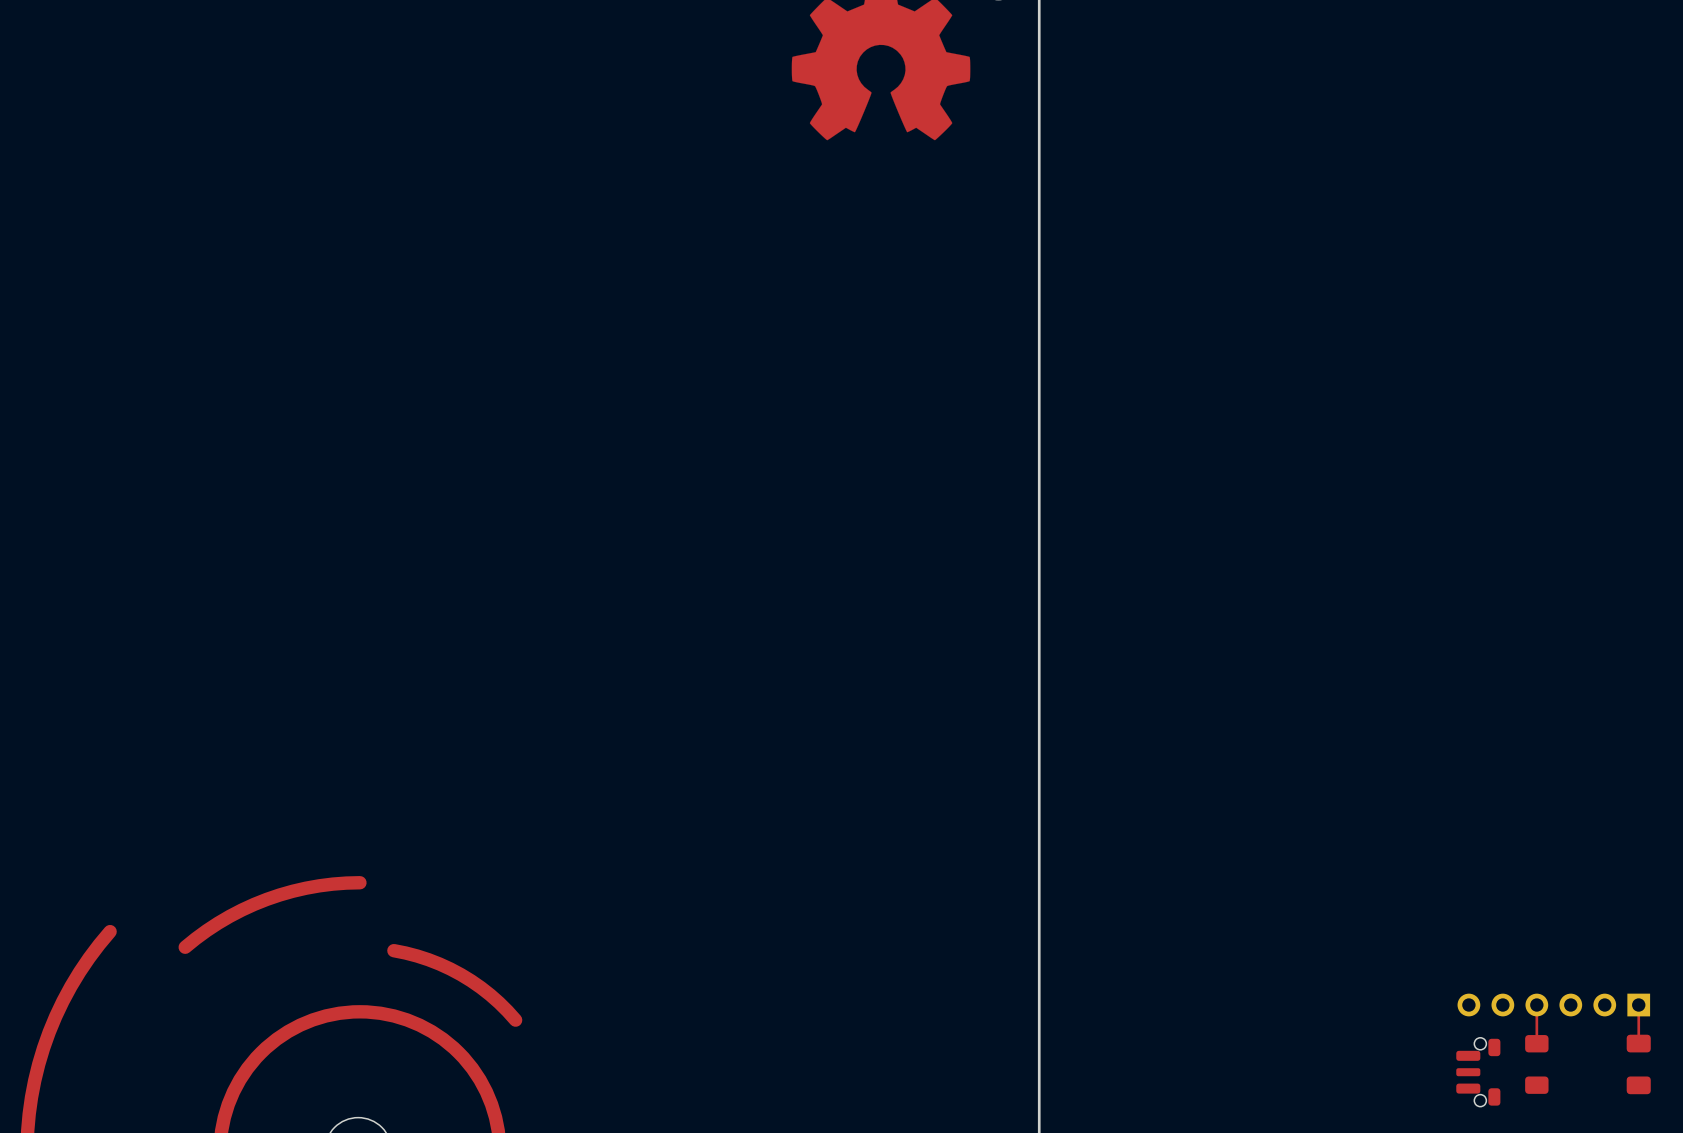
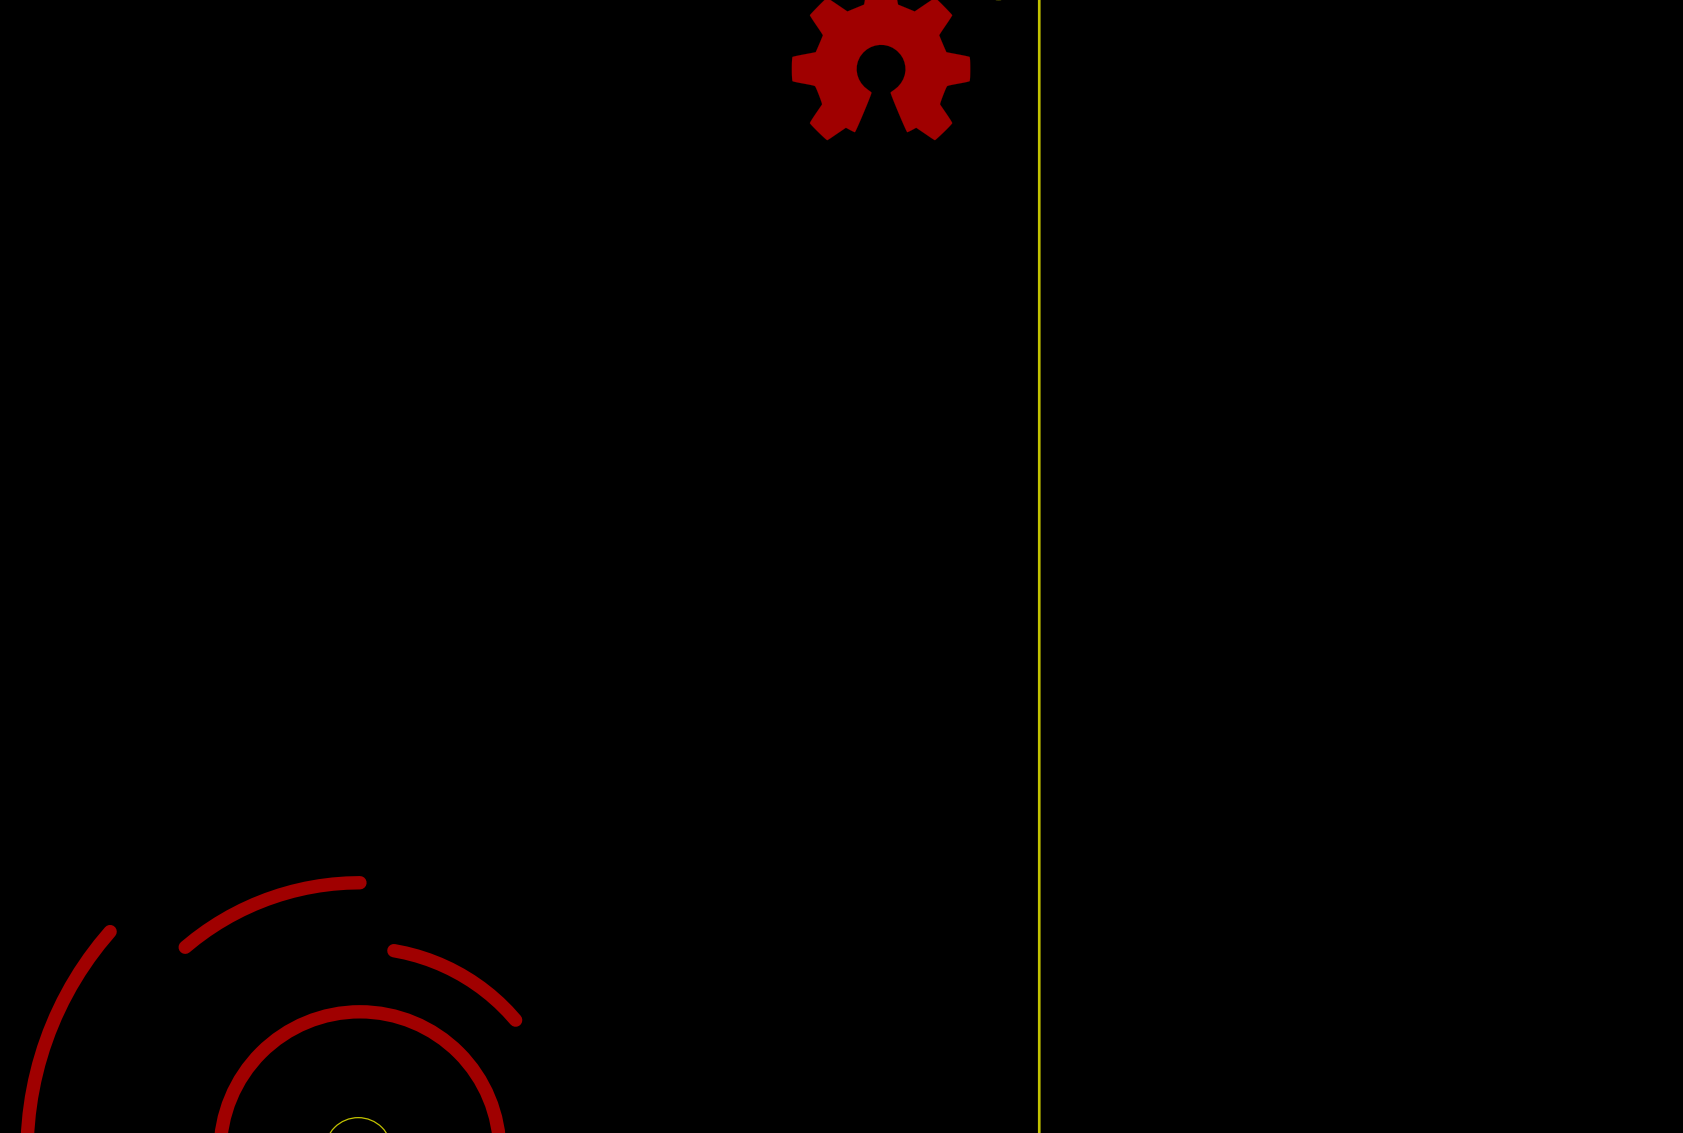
top track: (1536, 1005) (1536, 1043) -> none
part: (1553, 1005) -> none
top track: (1638, 1005) (1638, 1043) -> none
part: (1536, 1064) -> none
part: (1638, 1064) -> none
part: (1478, 1072) -> none

